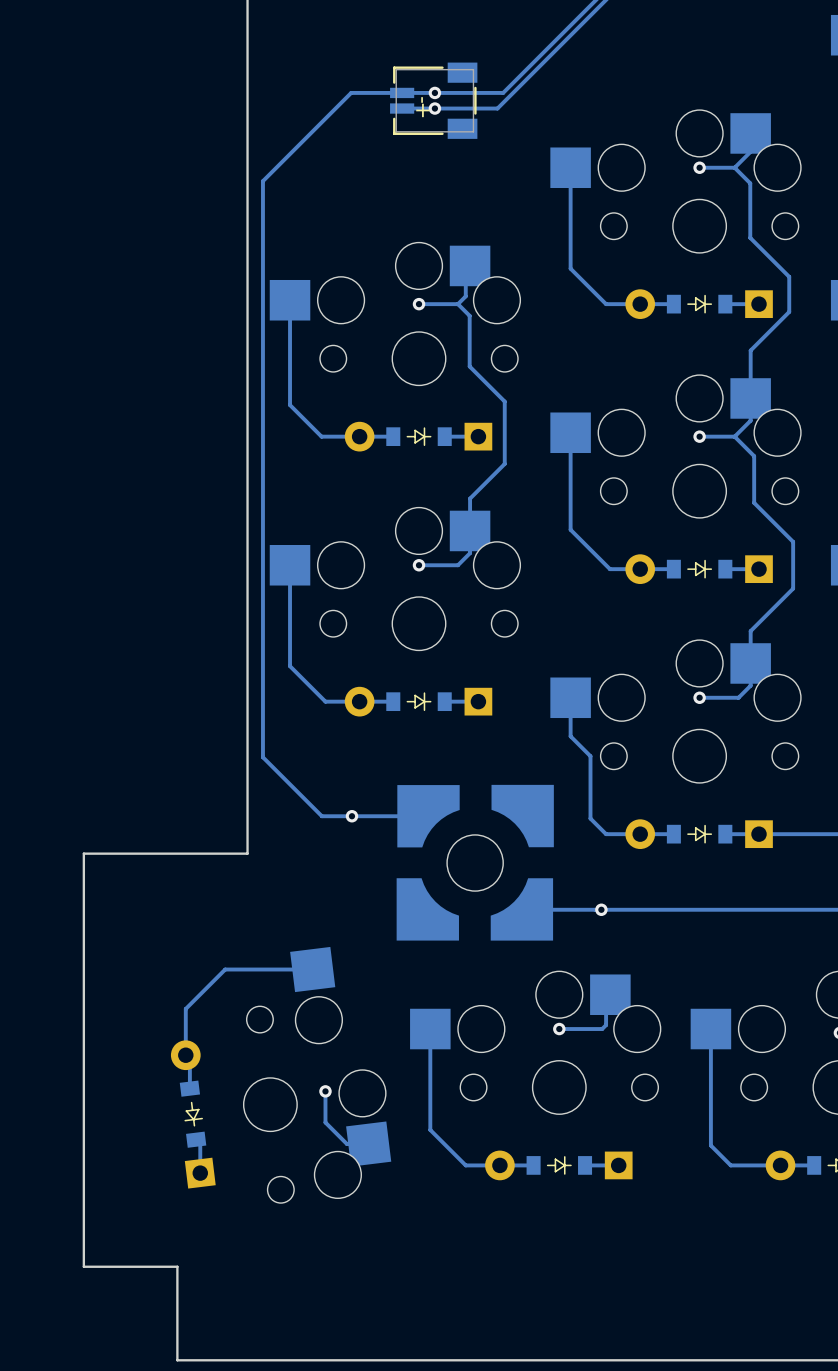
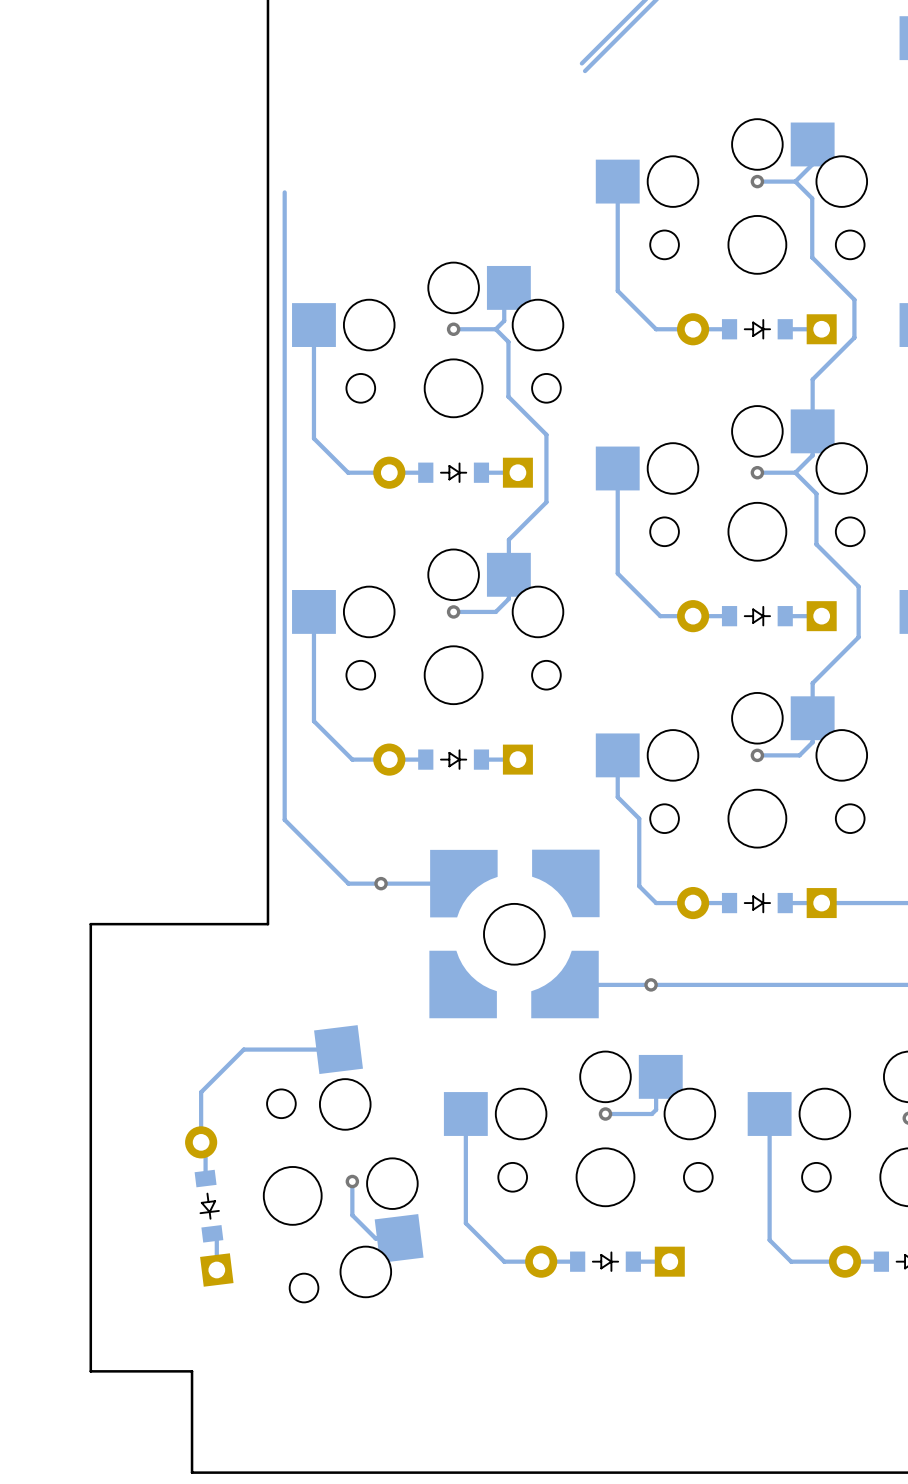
track: (537, 58) (503, 92) (351, 92) (262, 181) -> (284, 192) (284, 196)
track: (540, 65) (497, 108) (402, 108) -> none
via: (434, 92) -> none
part: (433, 100) -> none
via: (434, 108) -> none

